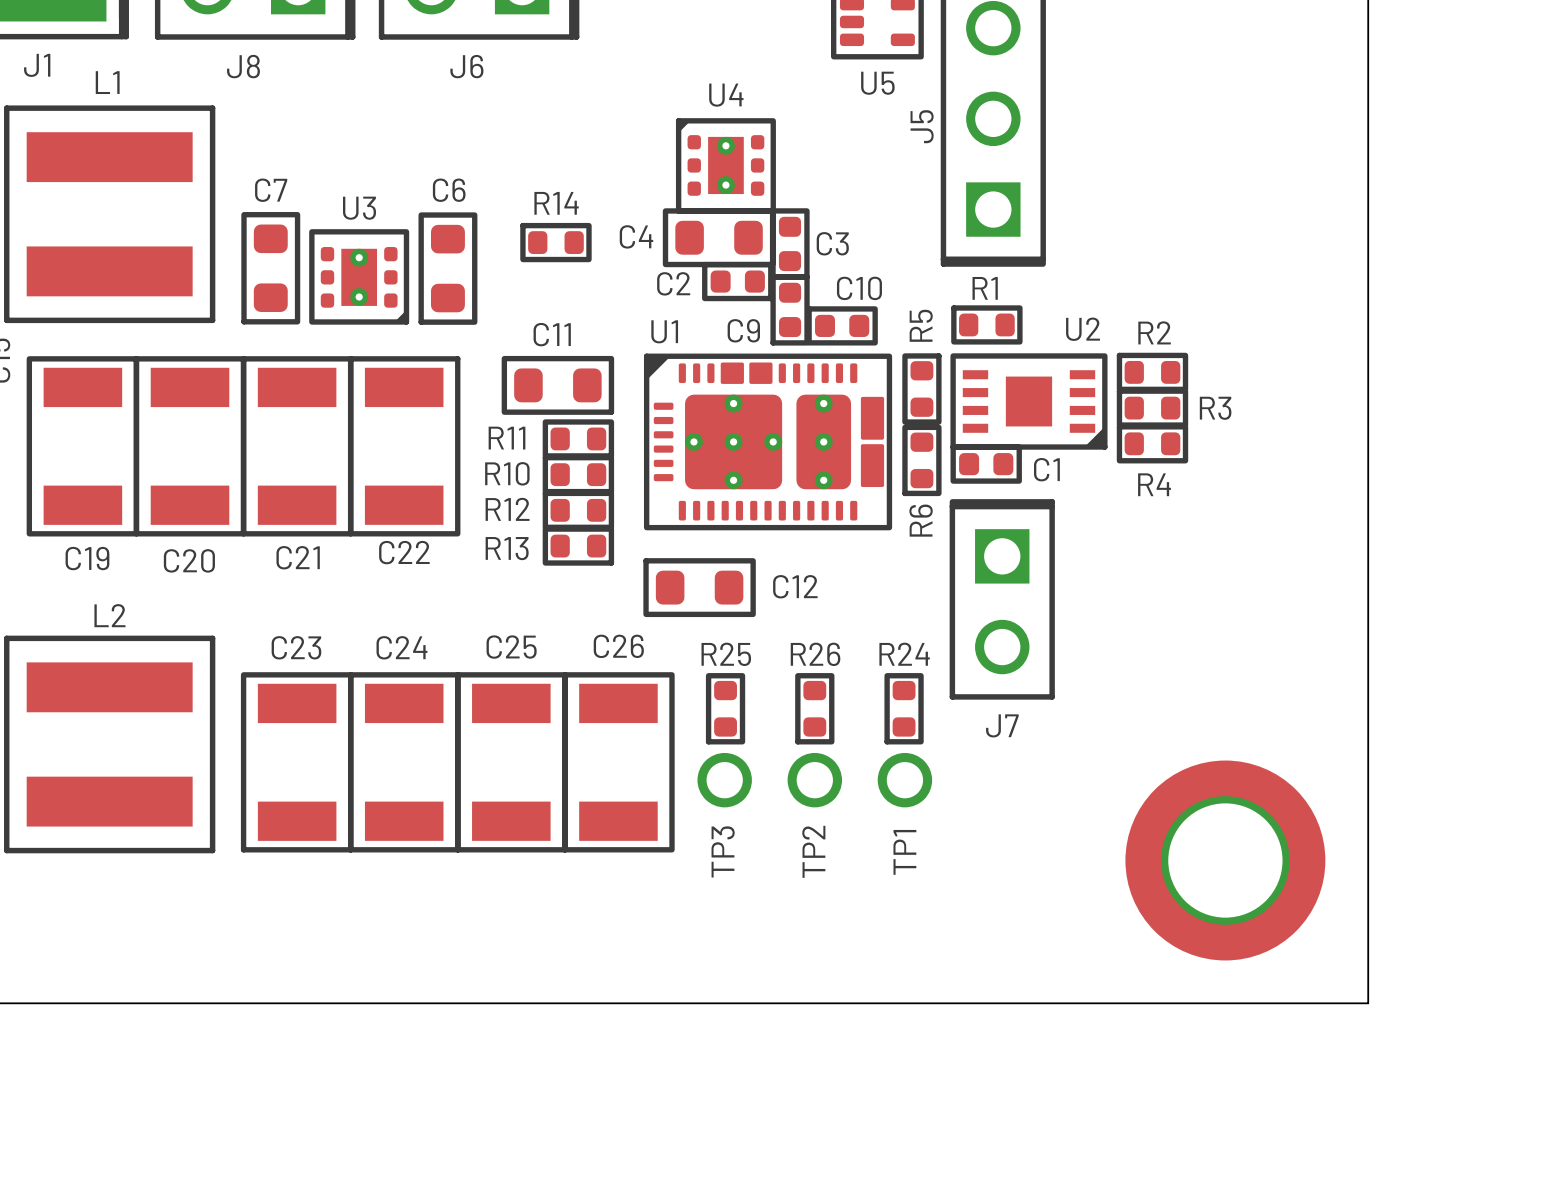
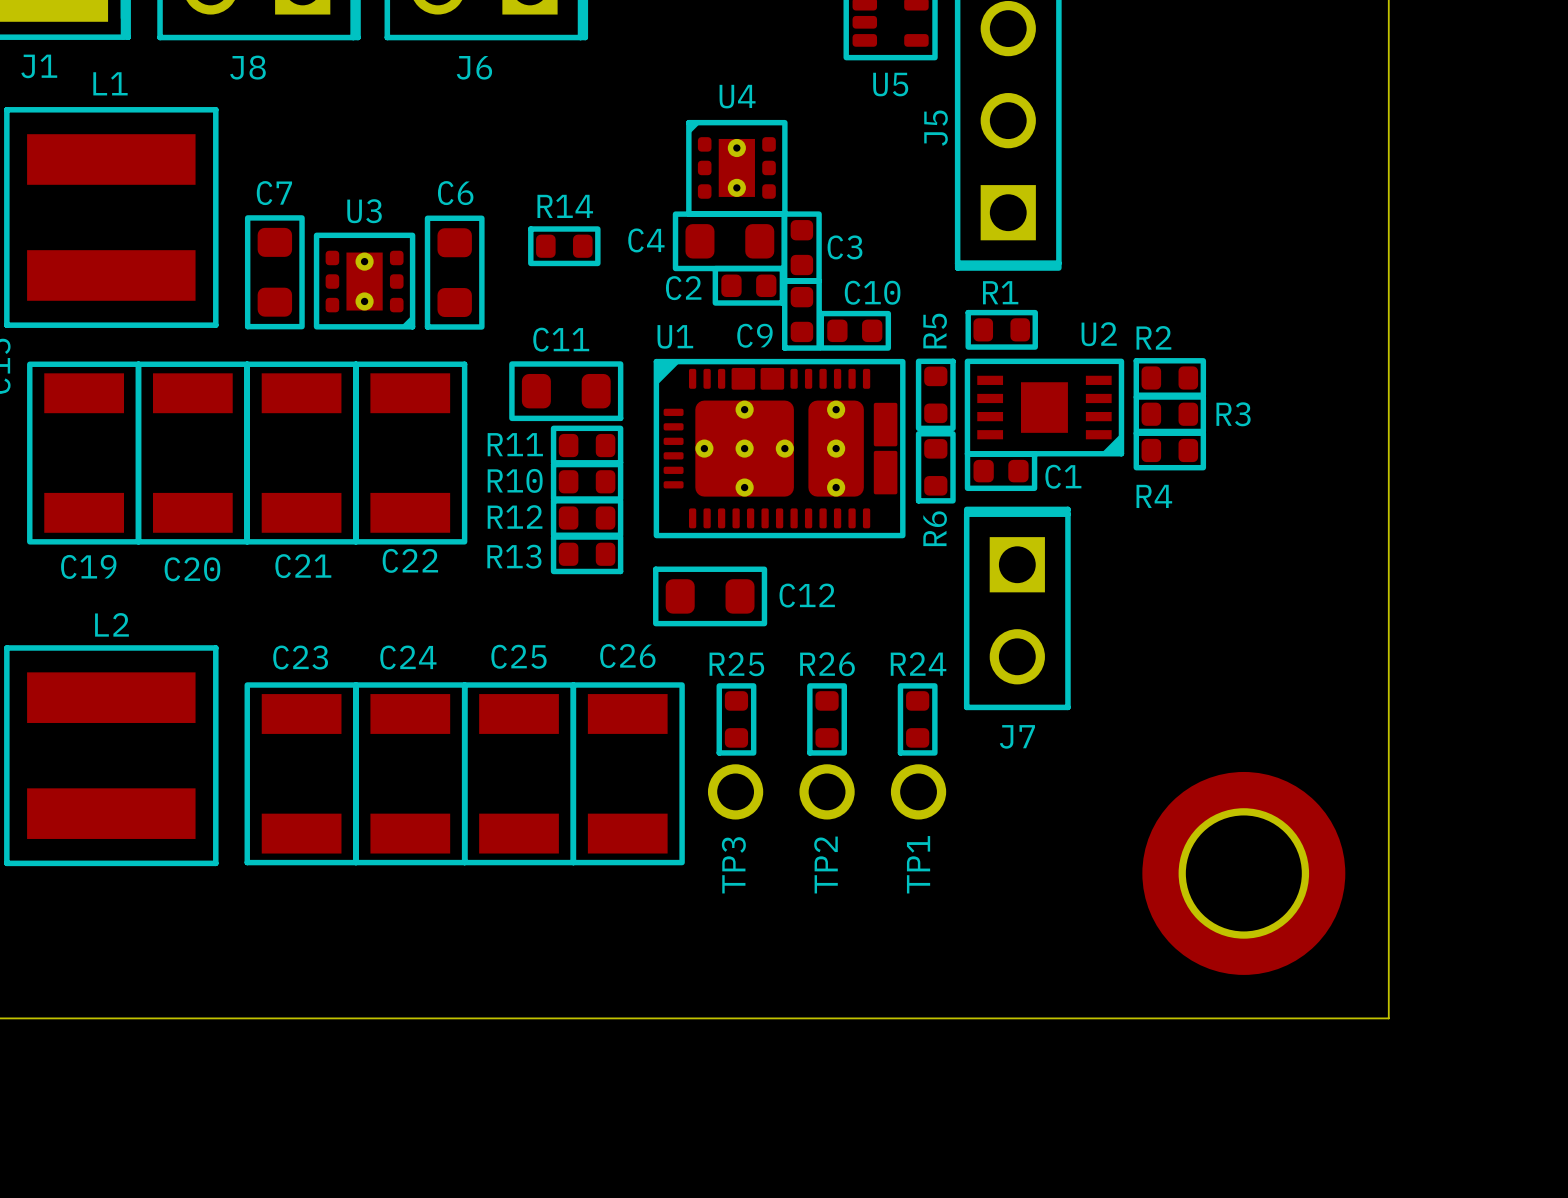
R2 name position: R2 (1154, 332) -> R2 (1153, 337)
R4 name position: R4 (1154, 484) -> R4 (1154, 496)

